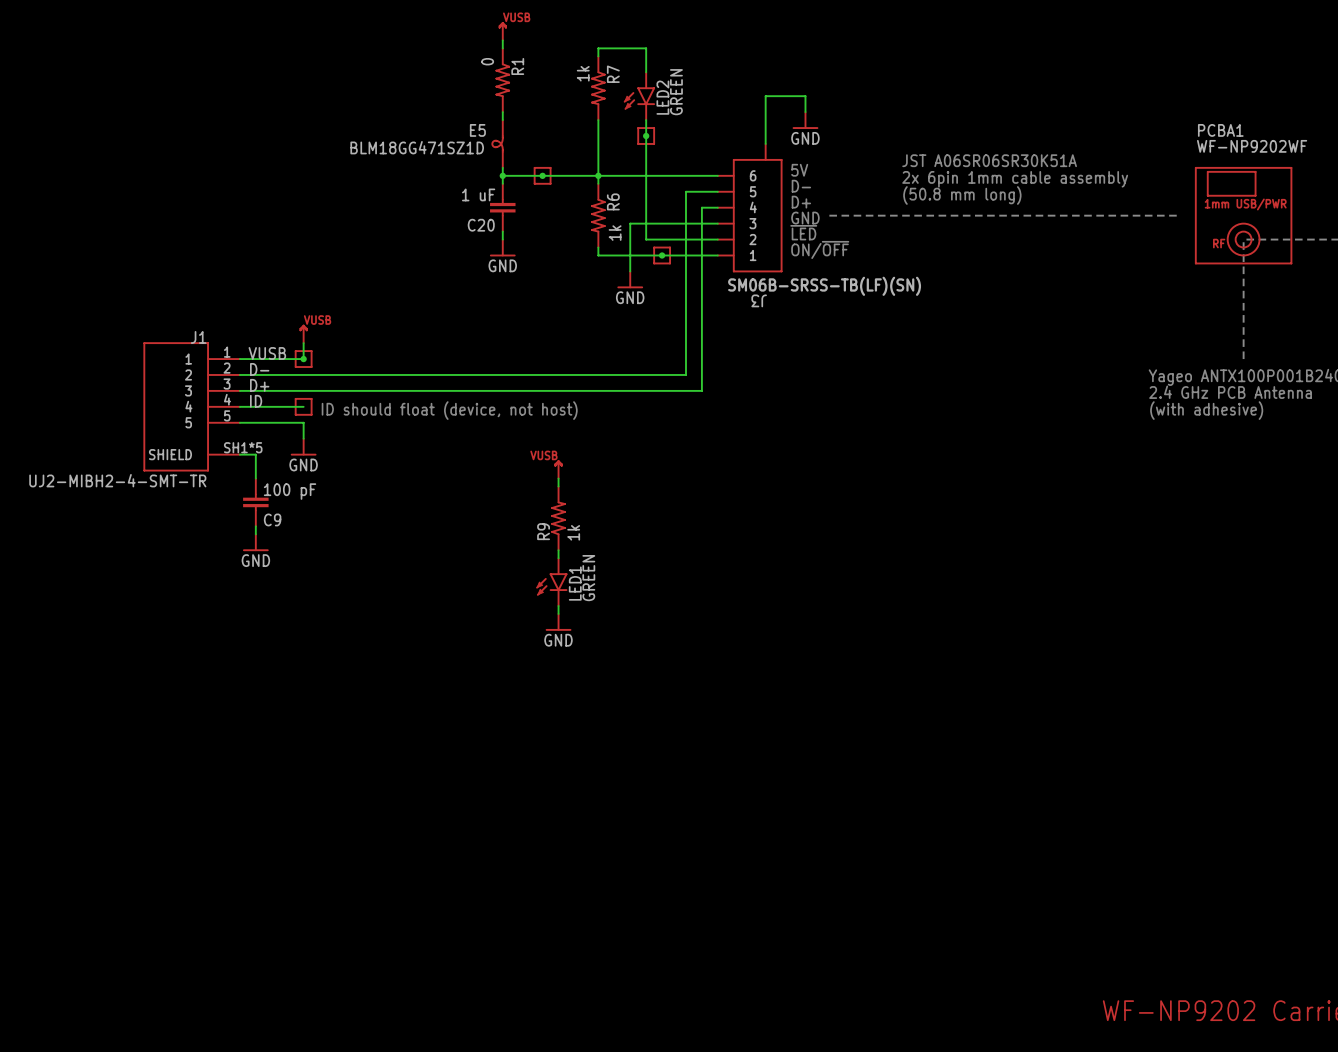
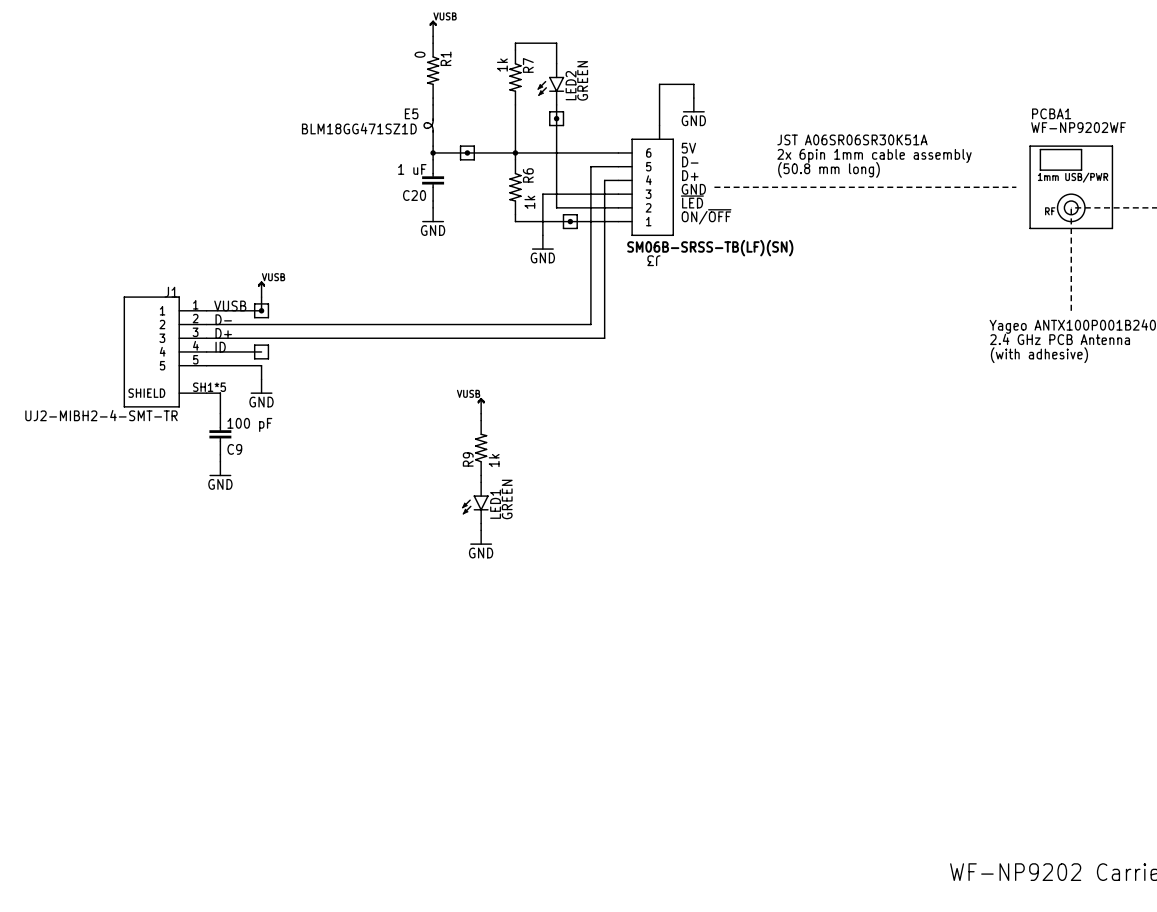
text: ID should float (device, not host) (449, 410) -> none

